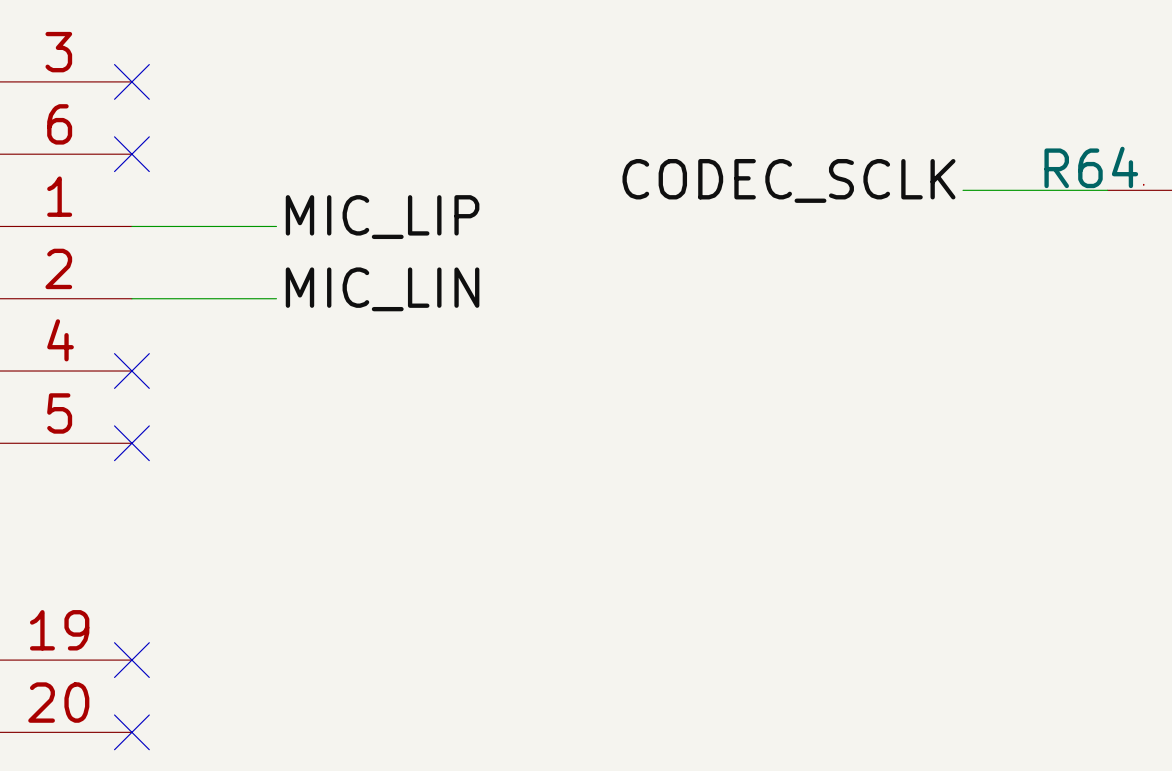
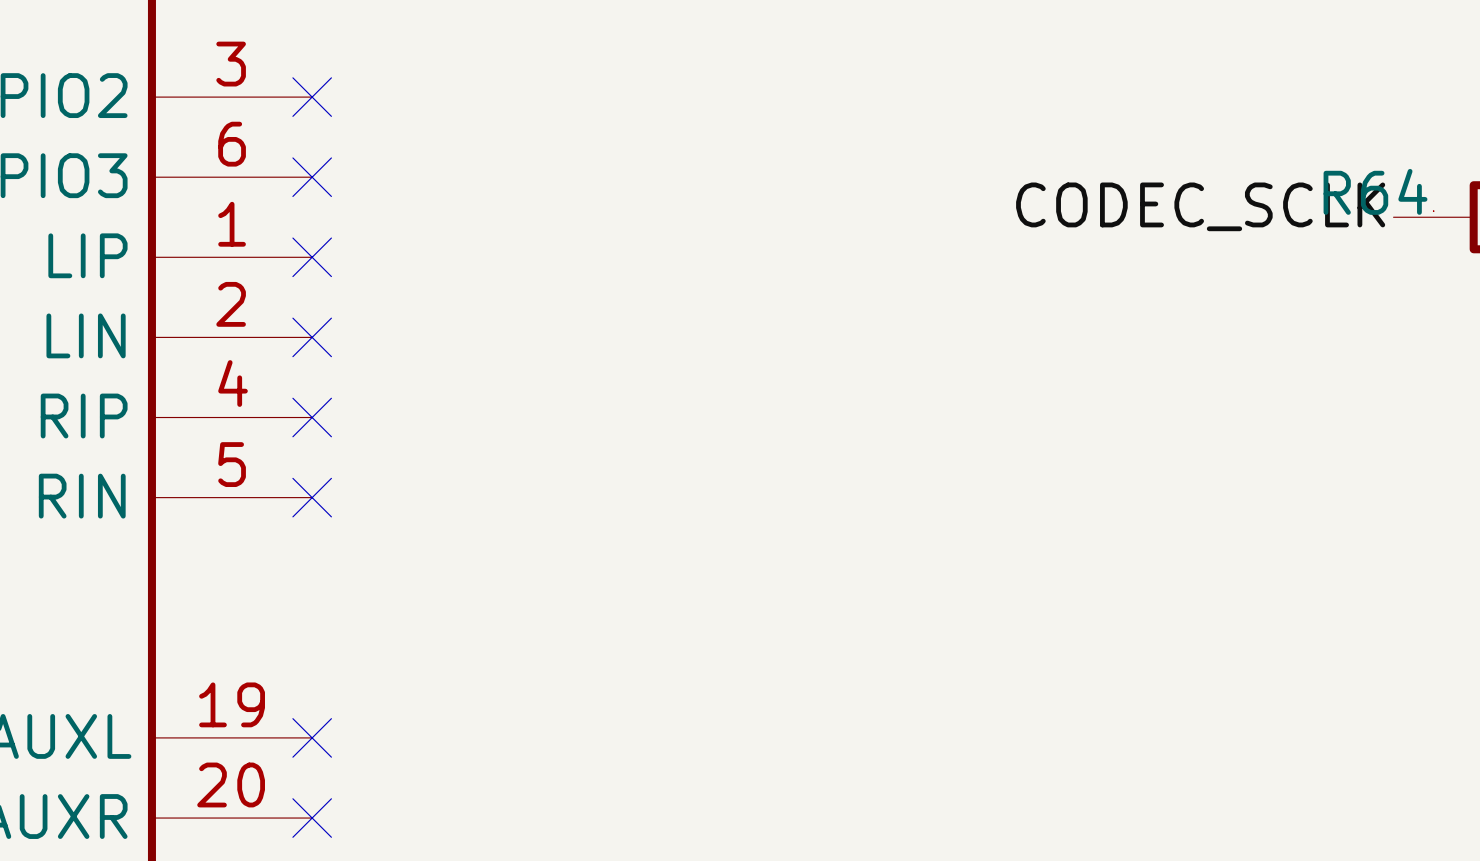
label position: CODEC_SCLK (788, 180) -> CODEC_SCLK (1200, 206)
wire: (963, 190) (1107, 190) -> none
label: MIC_LIP (382, 217) -> none
wire: (131, 226) (276, 226) -> none
no-connect mark: none -> (312, 257)
label: MIC_LIN (382, 289) -> none
wire: (131, 298) (276, 298) -> none
no-connect mark: none -> (312, 337)

